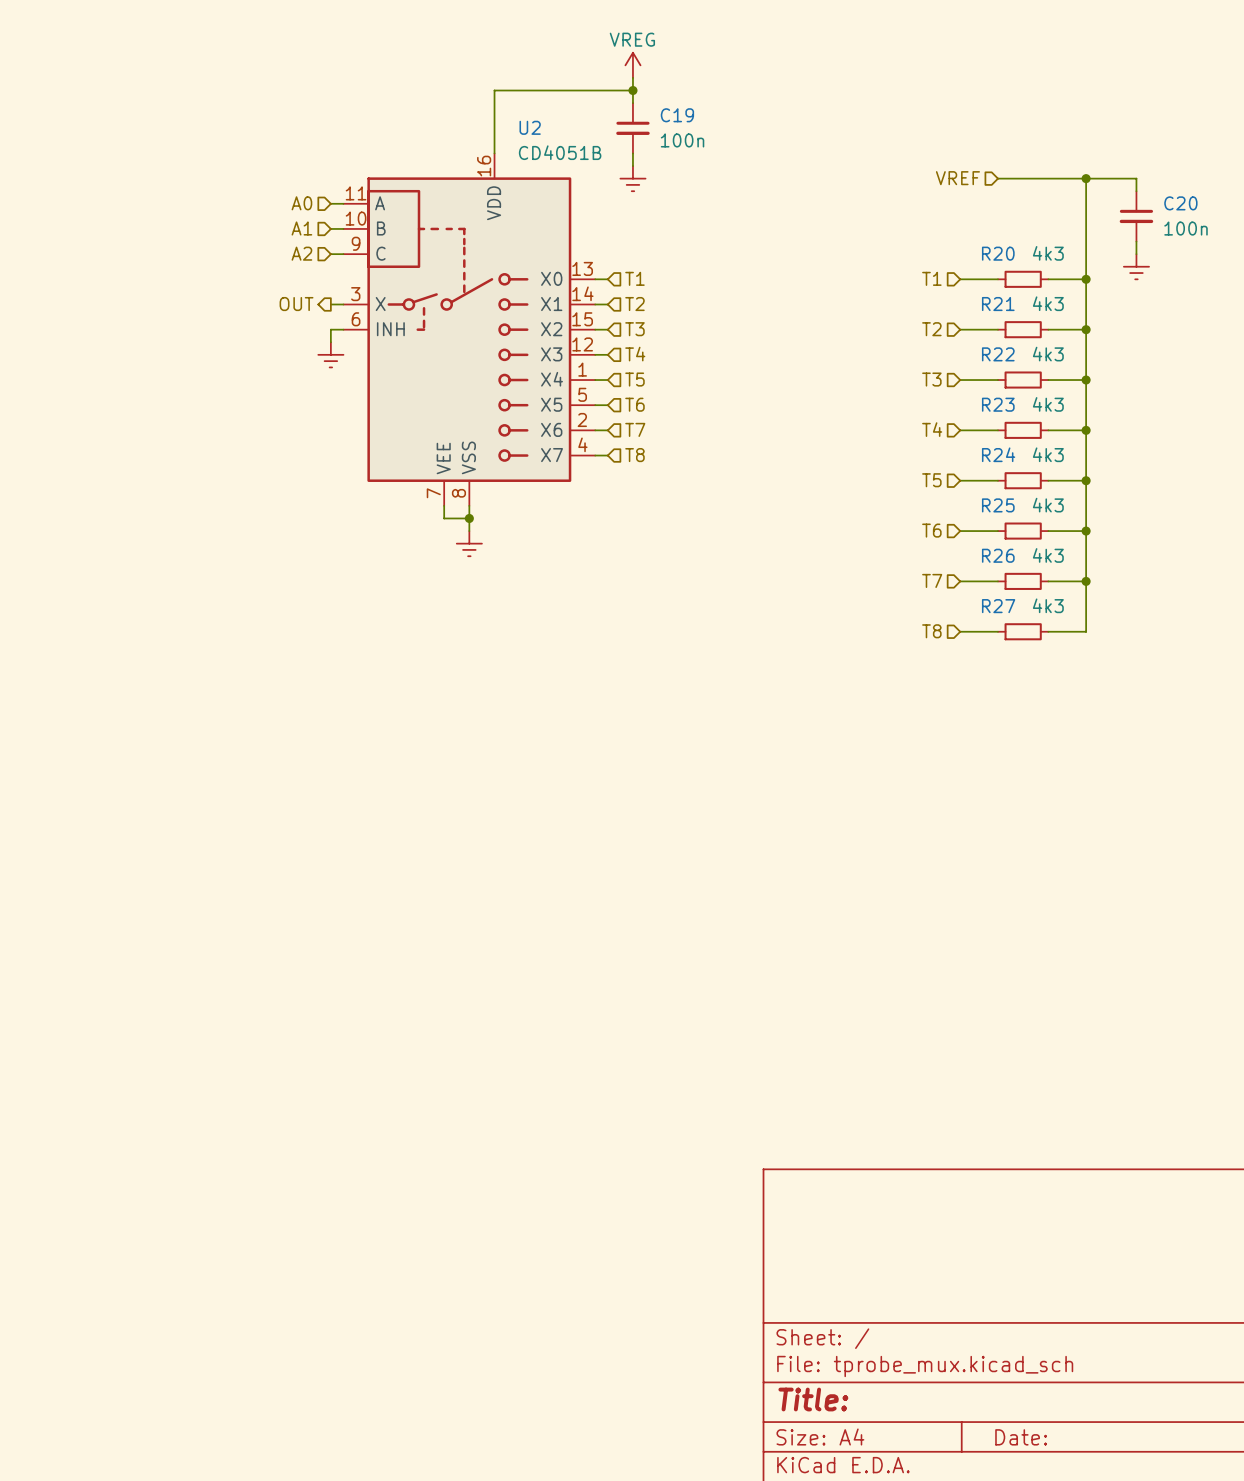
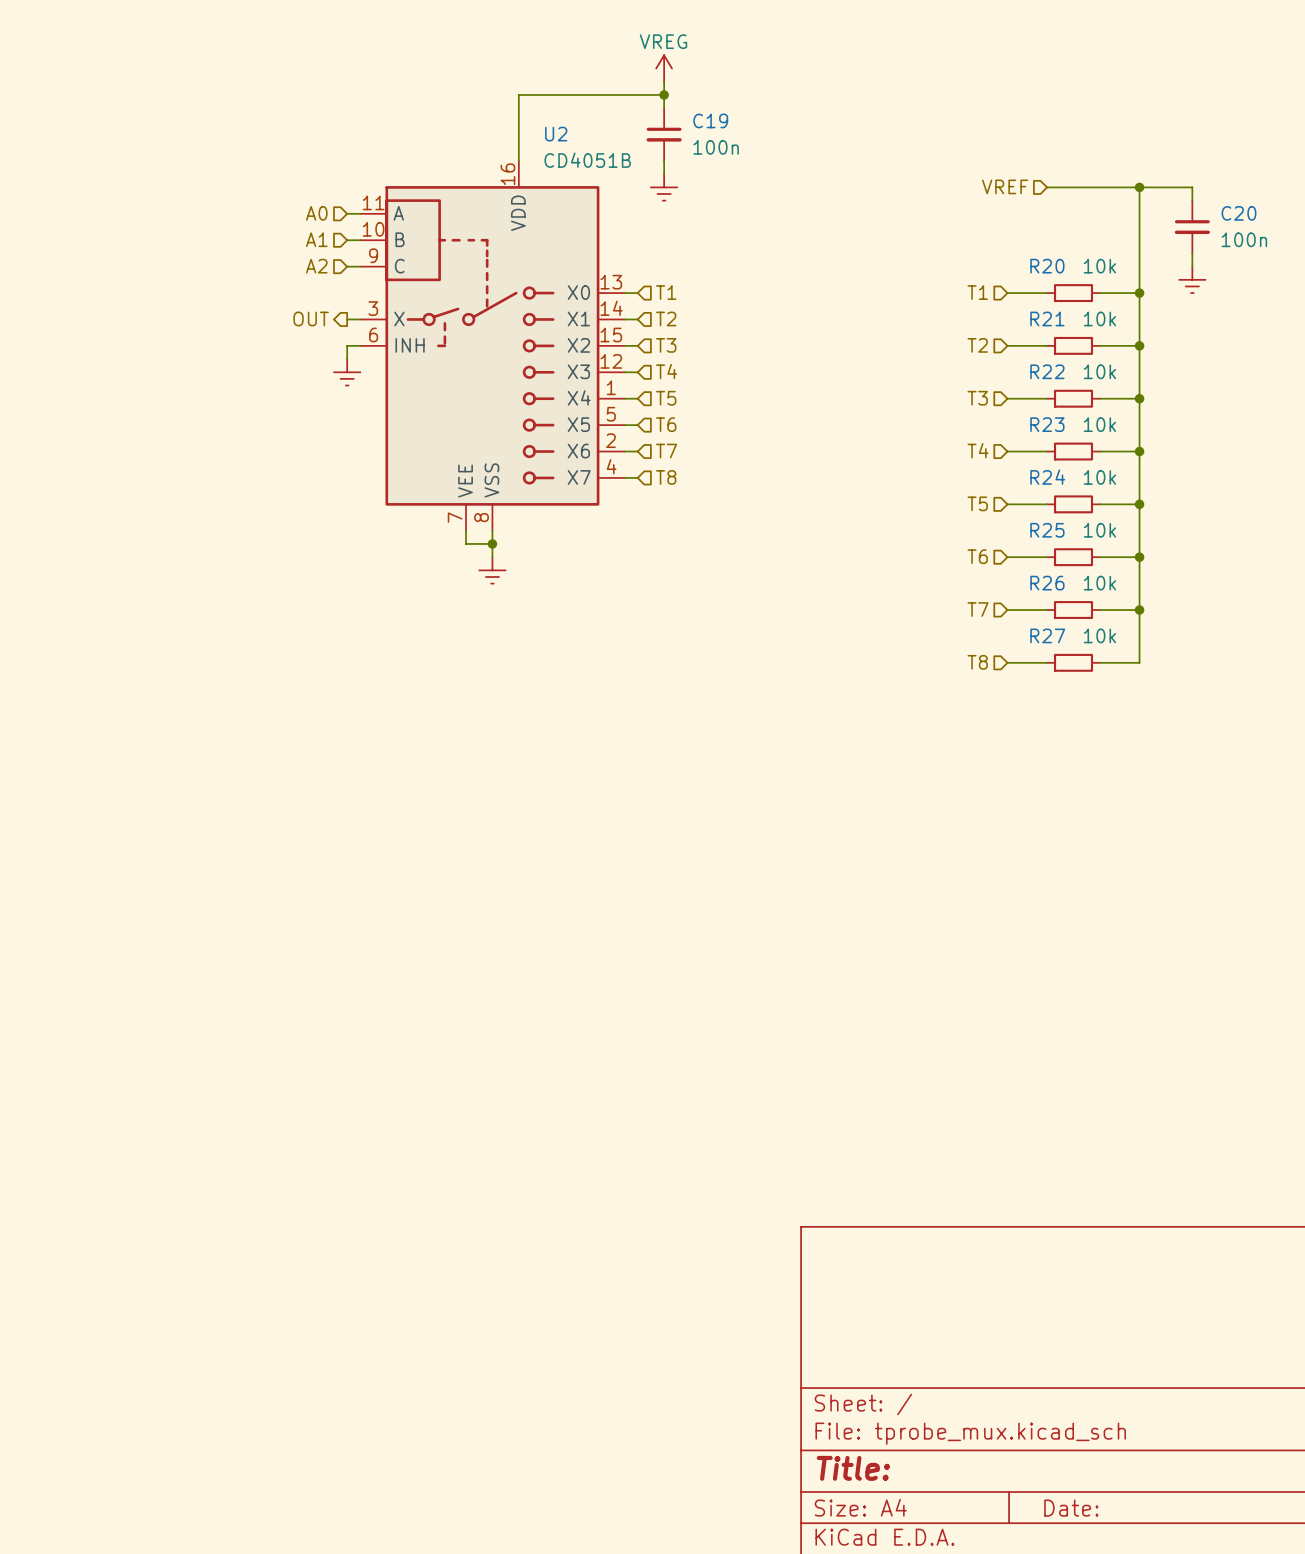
R20 value: 4k3 (1048, 253) -> 10k (1099, 266)
R21 value: 4k3 (1048, 303) -> 10k (1099, 318)
R22 value: 4k3 (1048, 354) -> 10k (1099, 371)
R23 value: 4k3 (1048, 404) -> 10k (1099, 424)
R24 value: 4k3 (1048, 454) -> 10k (1099, 477)
R25 value: 4k3 (1048, 505) -> 10k (1099, 530)
R26 value: 4k3 (1048, 555) -> 10k (1099, 583)
R27 value: 4k3 (1048, 605) -> 10k (1099, 635)

